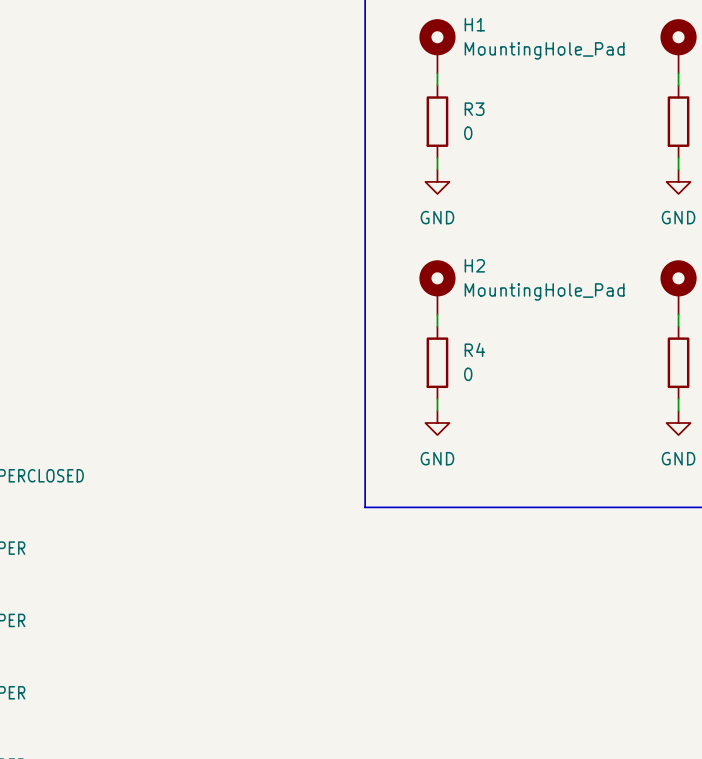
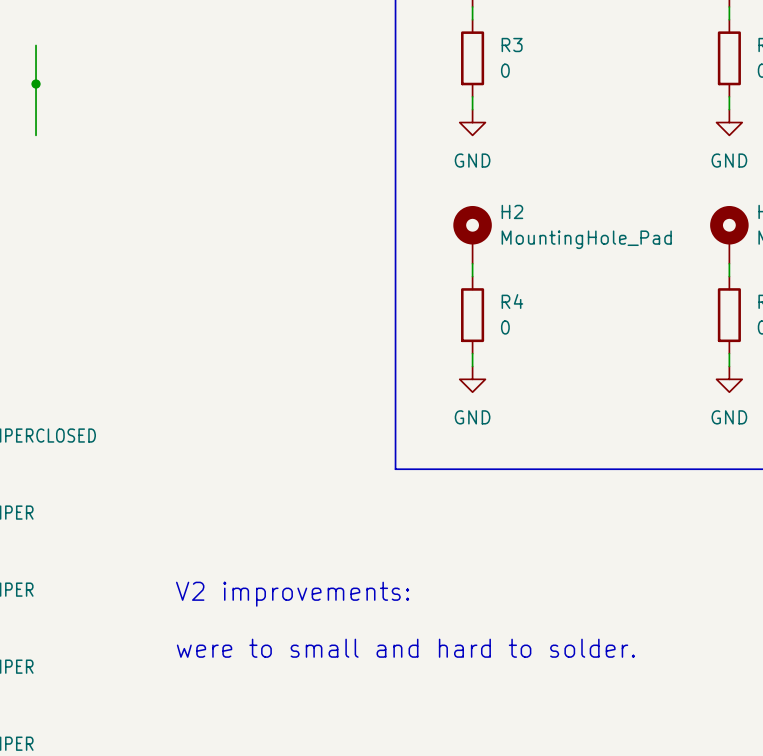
wire: none -> (36, 45) (36, 135)
junction: none -> (36, 84)
text: none -> V2 improvements: (292, 594)
text: none -> were to small and hard to solder. (405, 648)

